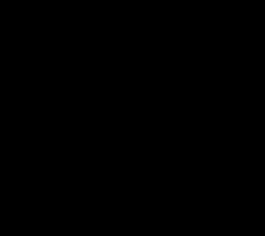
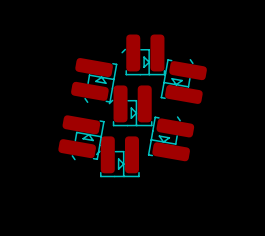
part: none -> (143, 54)
part: none -> (94, 80)
part: none -> (183, 81)
part: none -> (130, 105)
part: none -> (81, 137)
part: none -> (171, 138)
part: none -> (117, 156)

